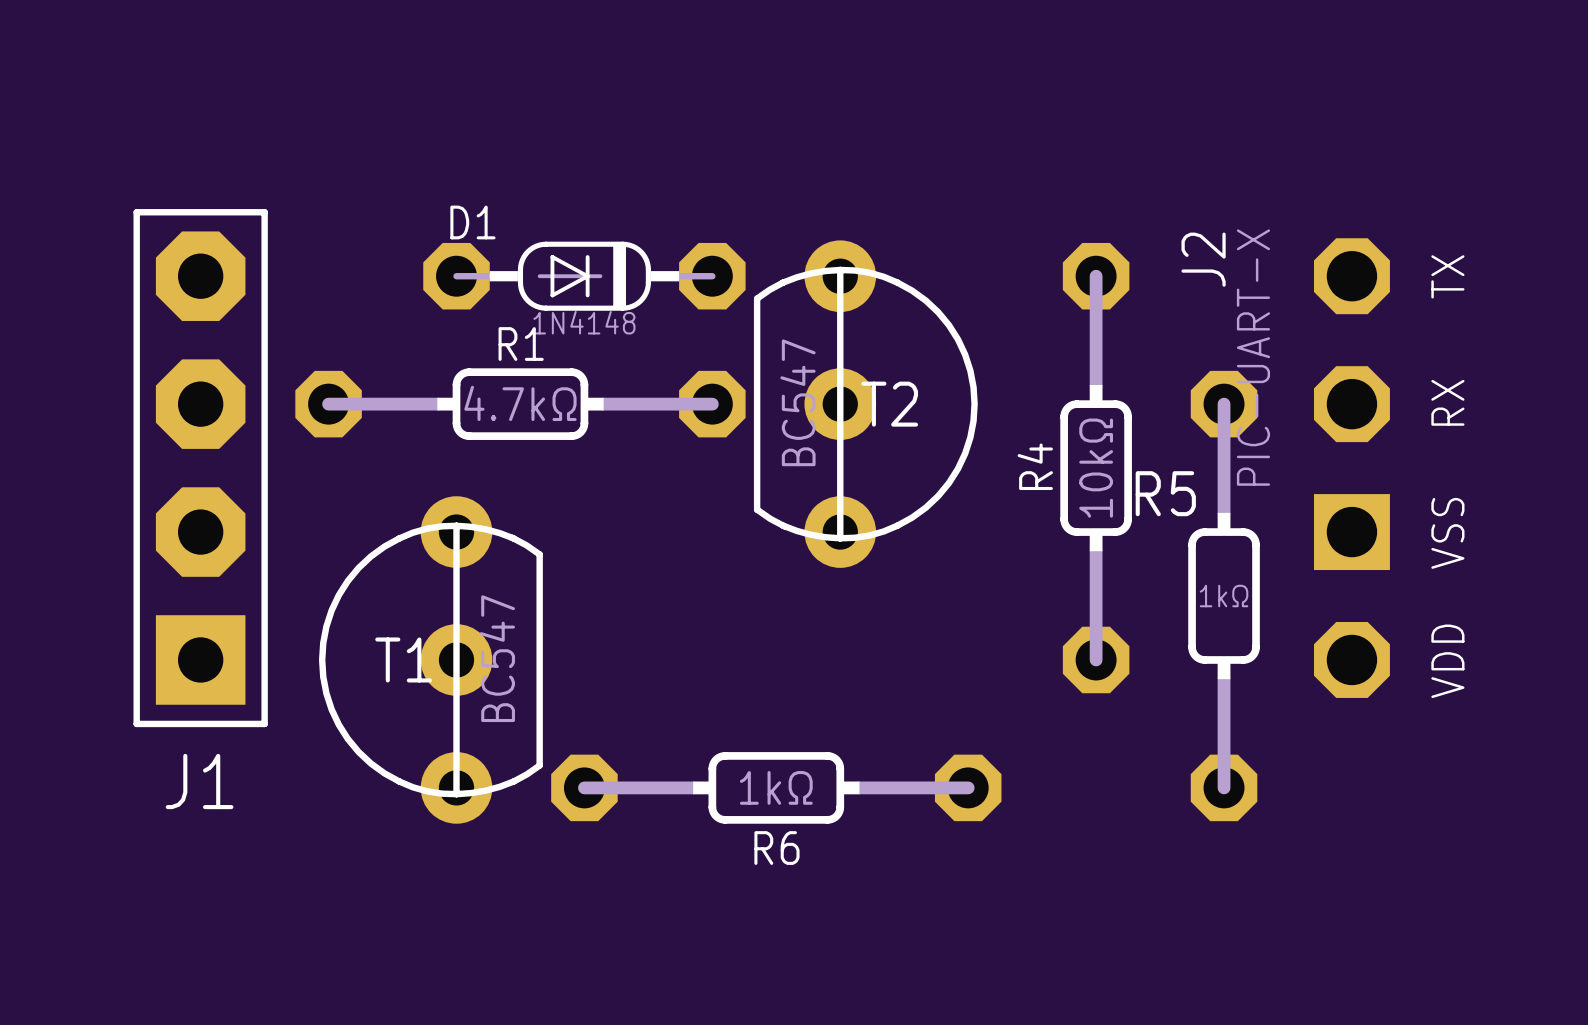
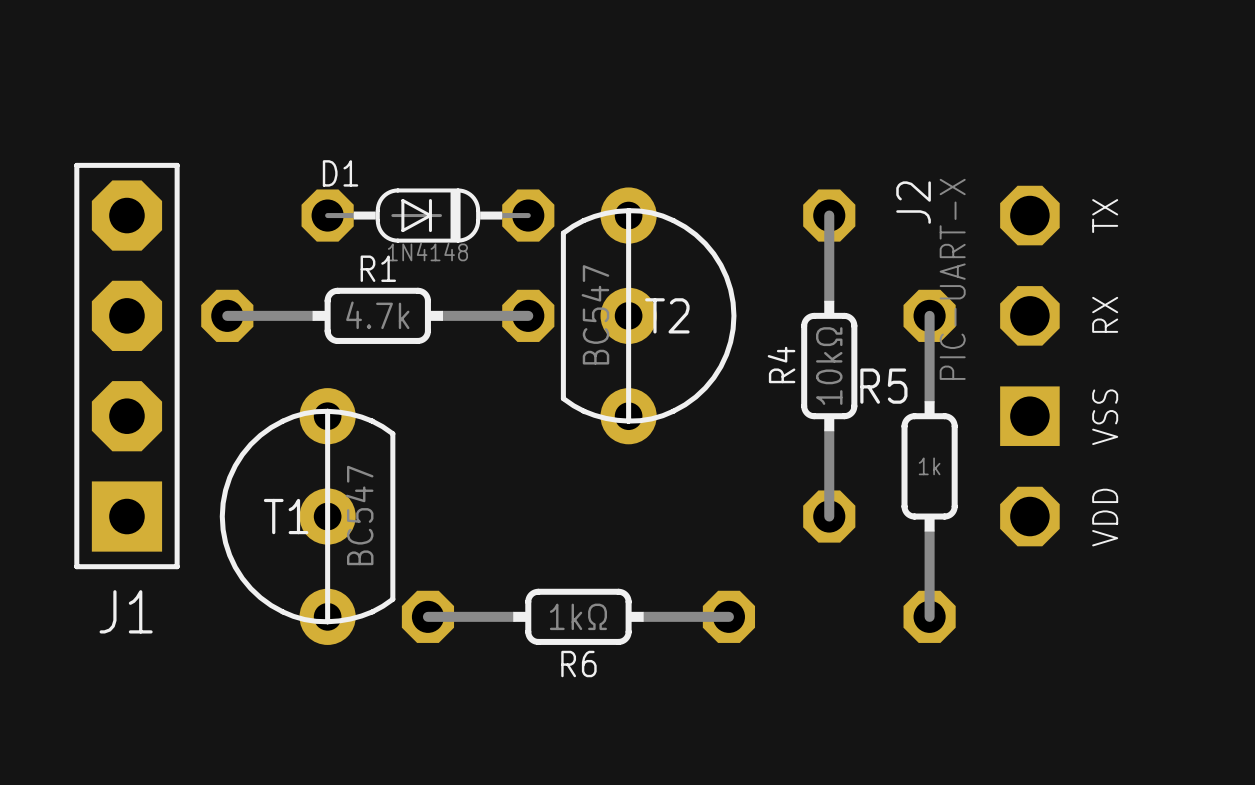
R1 value: 4.7kΩ (520, 403) -> 4.7k (377, 315)
R5 value: 1kΩ (1224, 596) -> 1k (929, 466)

